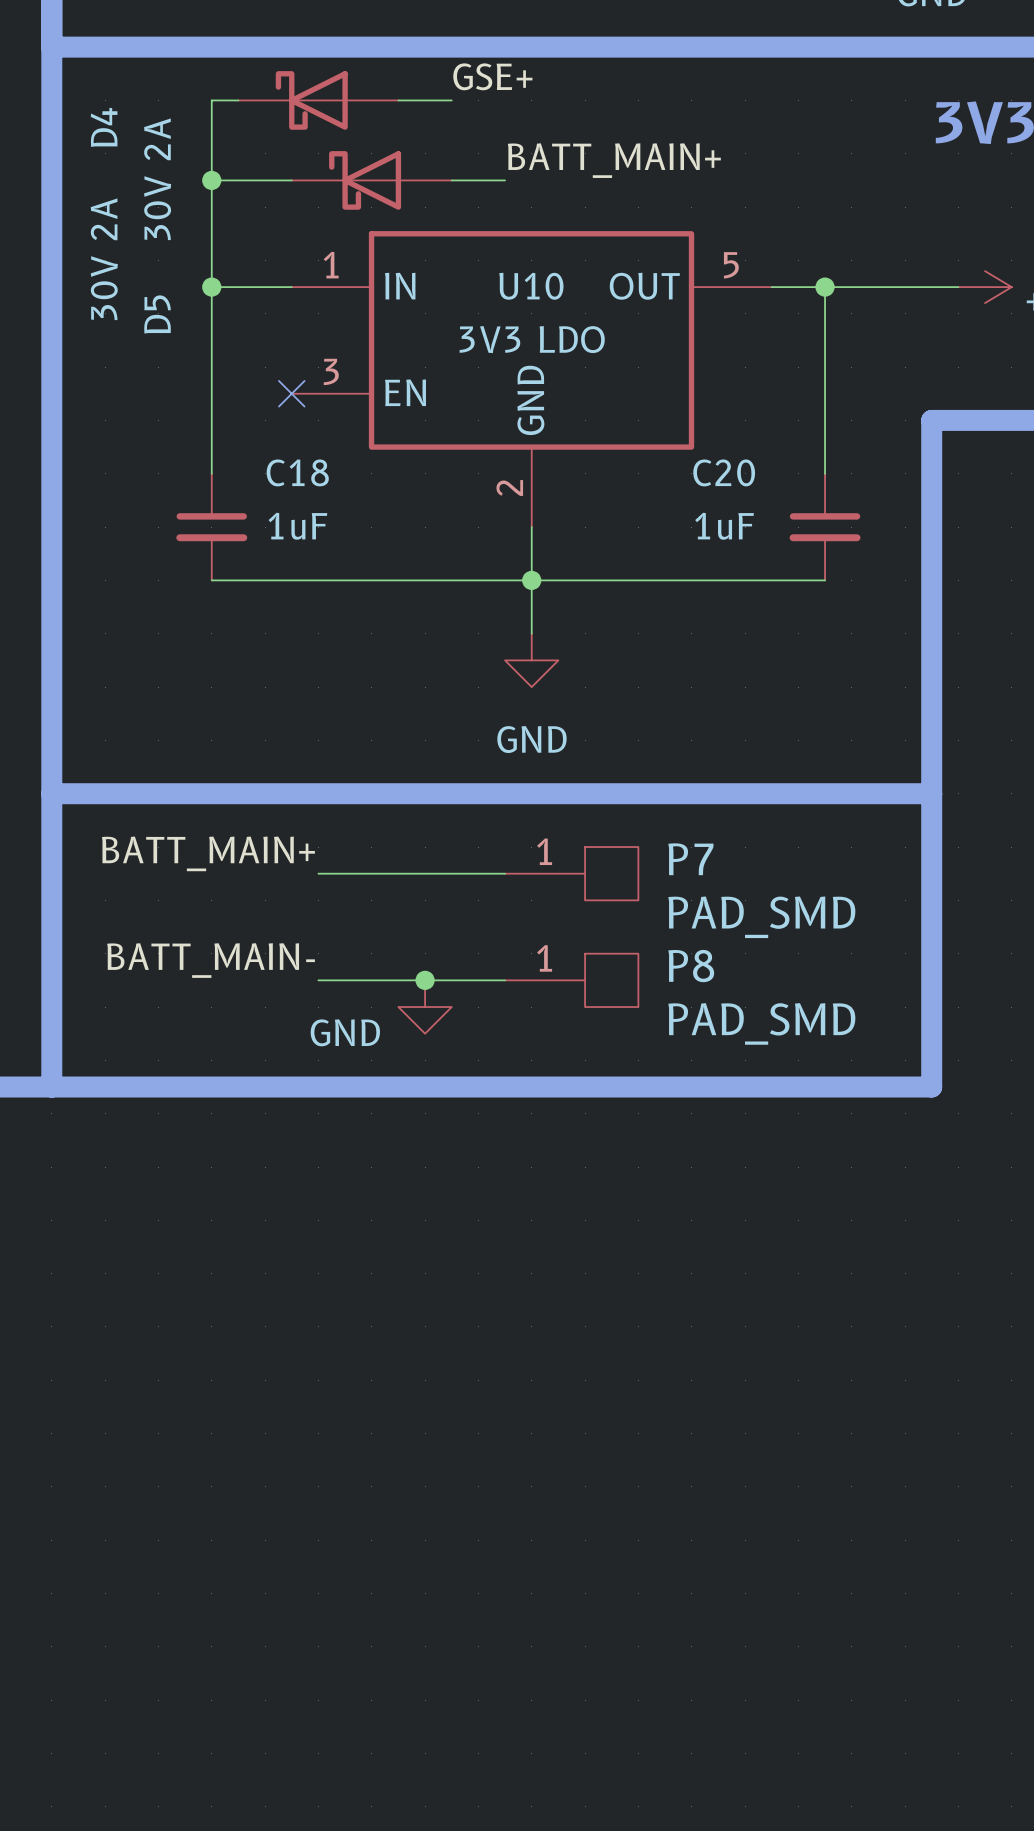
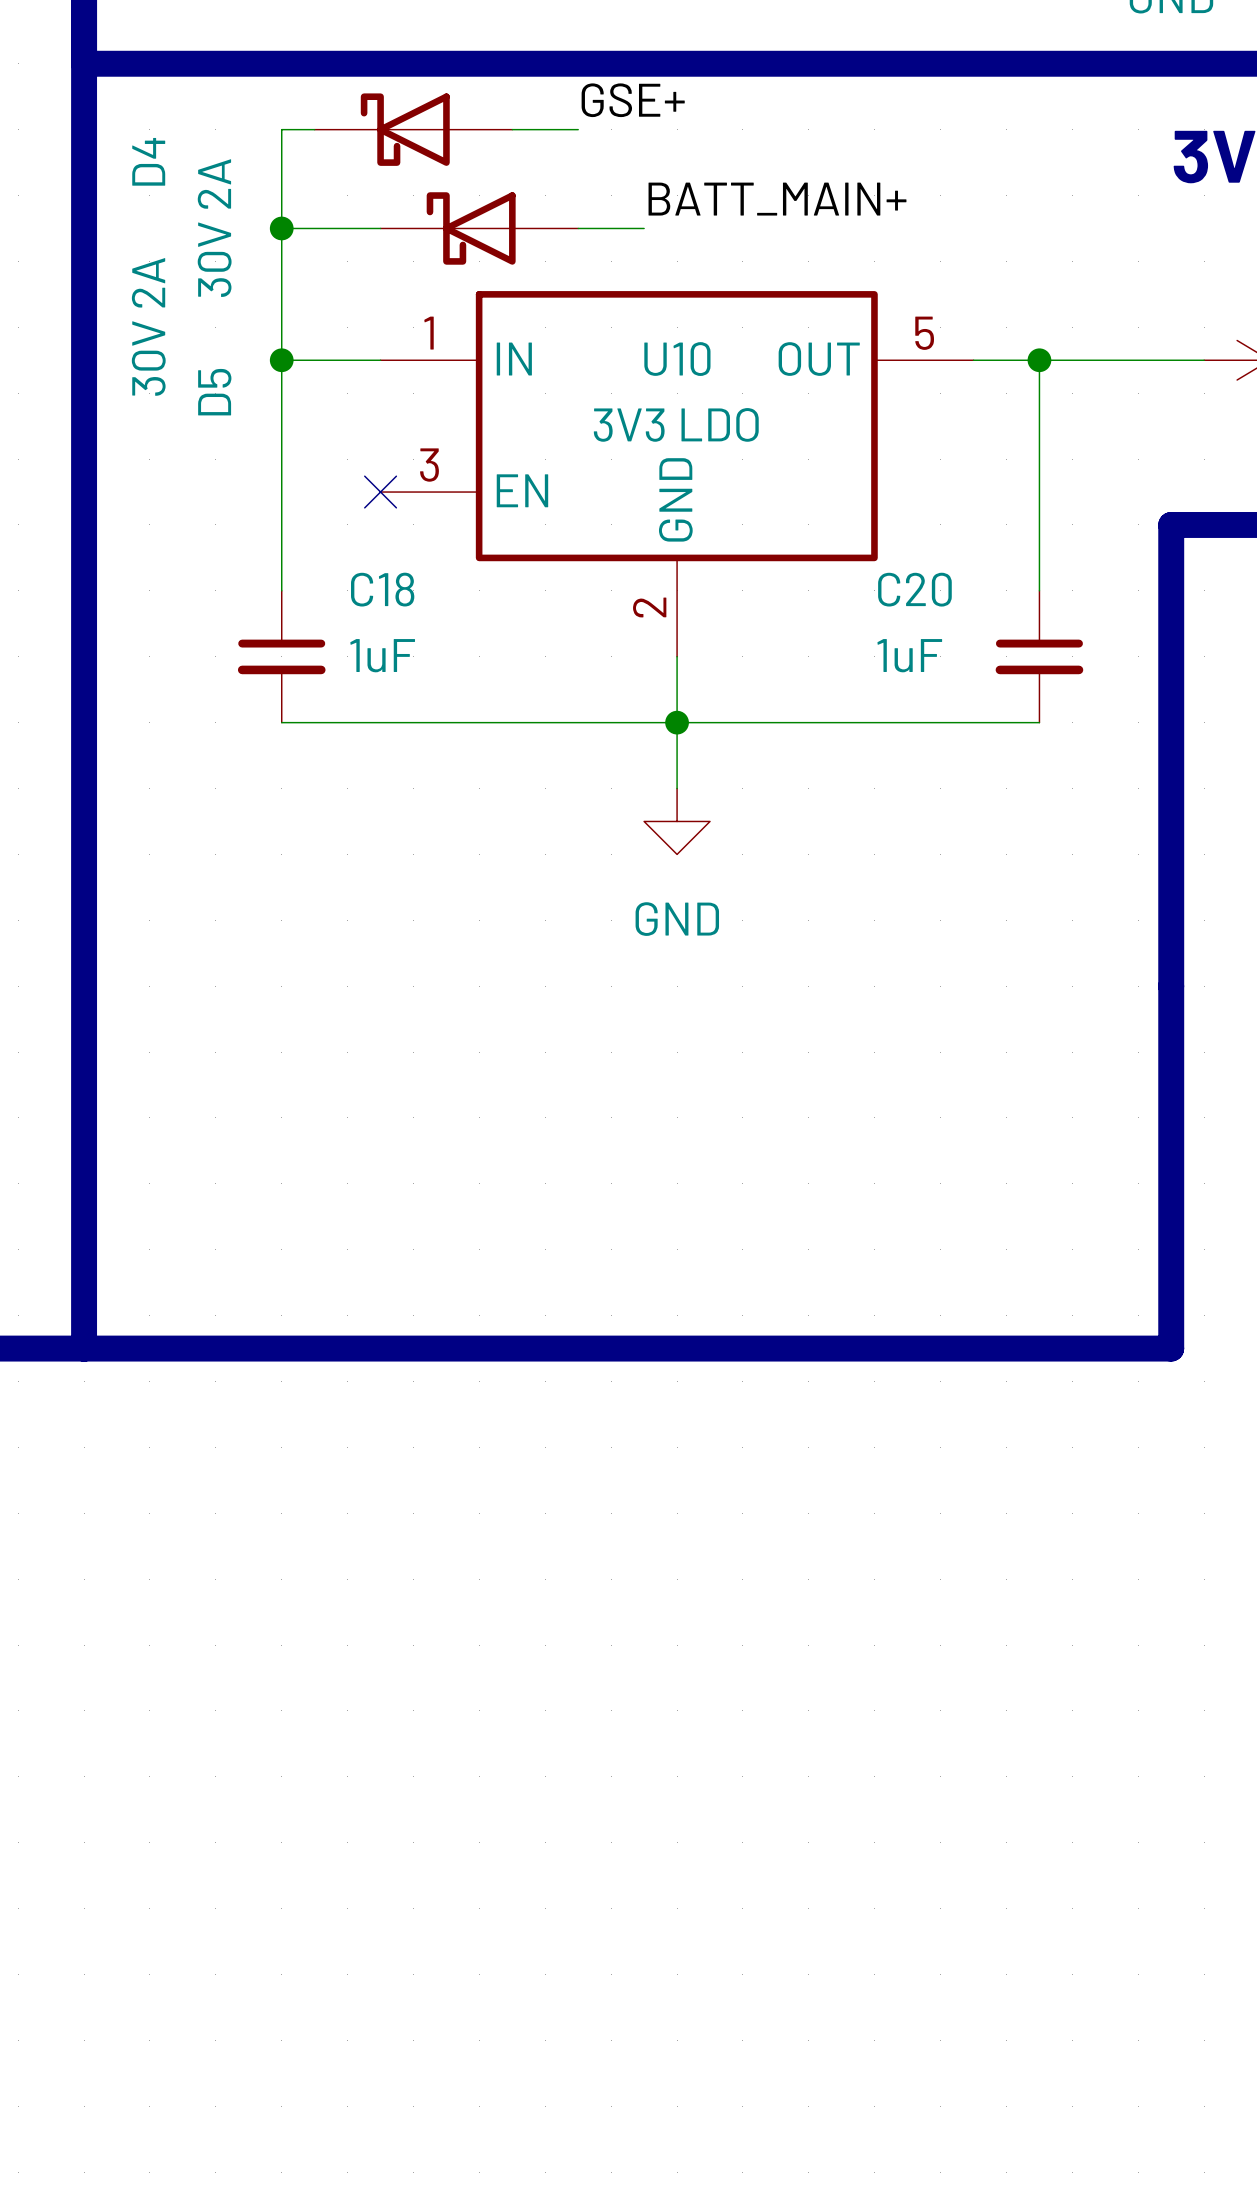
line: (51, 793) (931, 793) -> none
label: BATT_MAIN+ (208, 853) -> none
wire: (318, 873) (505, 873) -> none
P7: PAD_SMD (571, 873) -> none
label: BATT_MAIN- (211, 960) -> none
wire: (318, 980) (505, 980) -> none
junction: (425, 980) -> none
P8: PAD_SMD (571, 980) -> none
power symbol: GND (425, 1007) -> none

